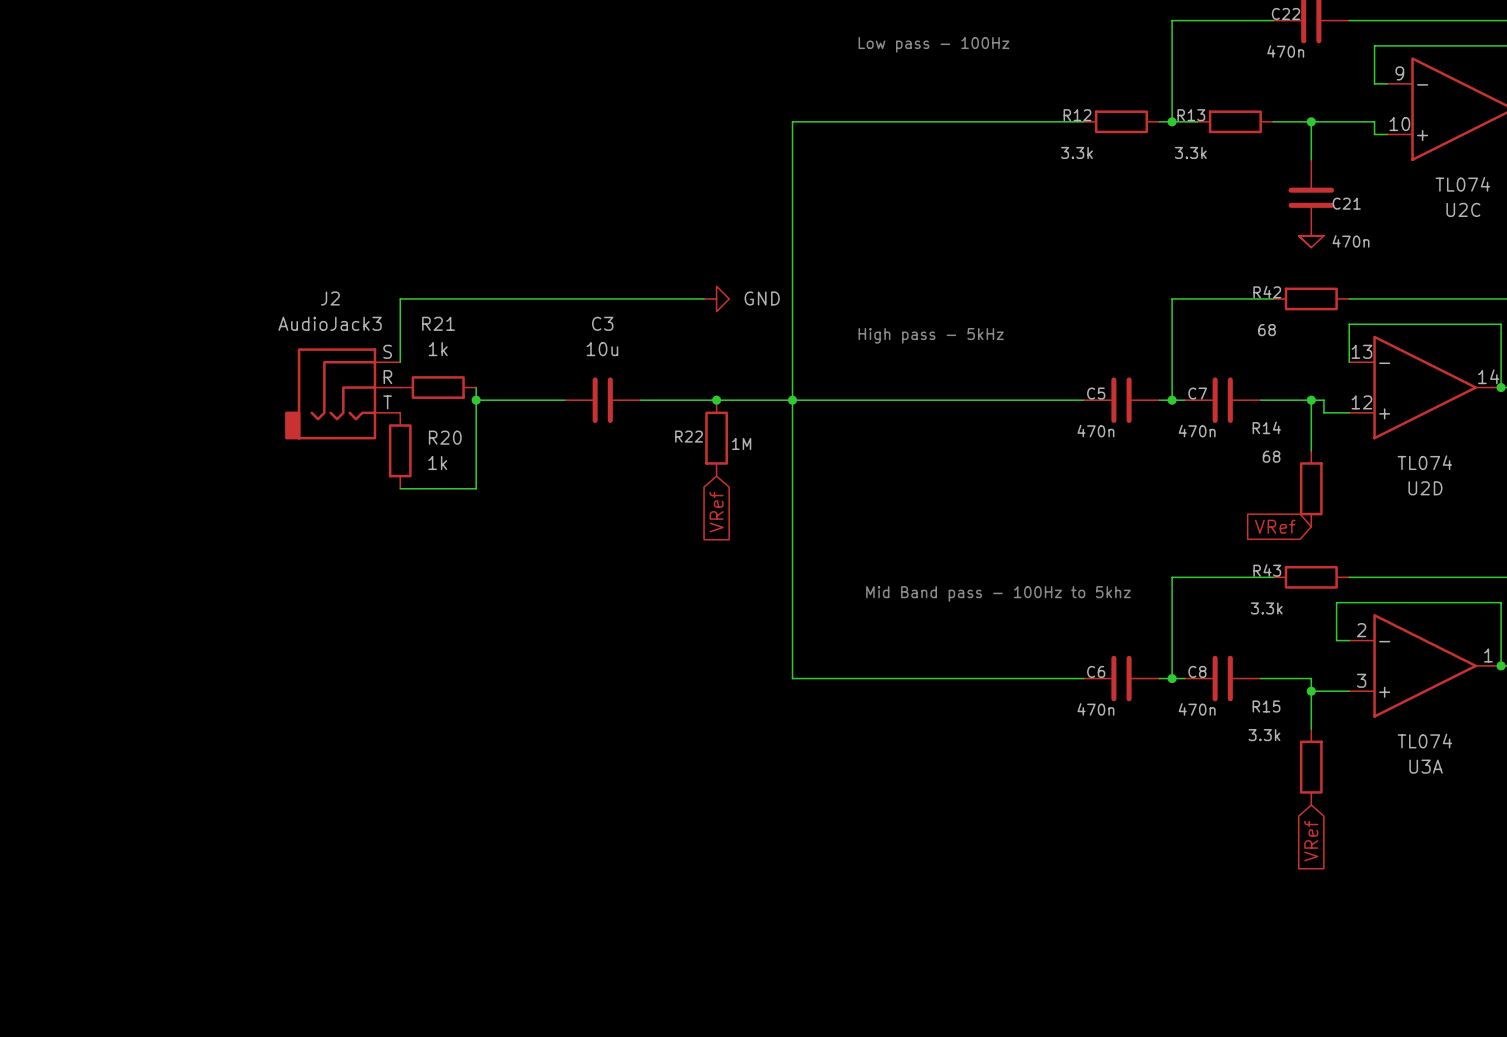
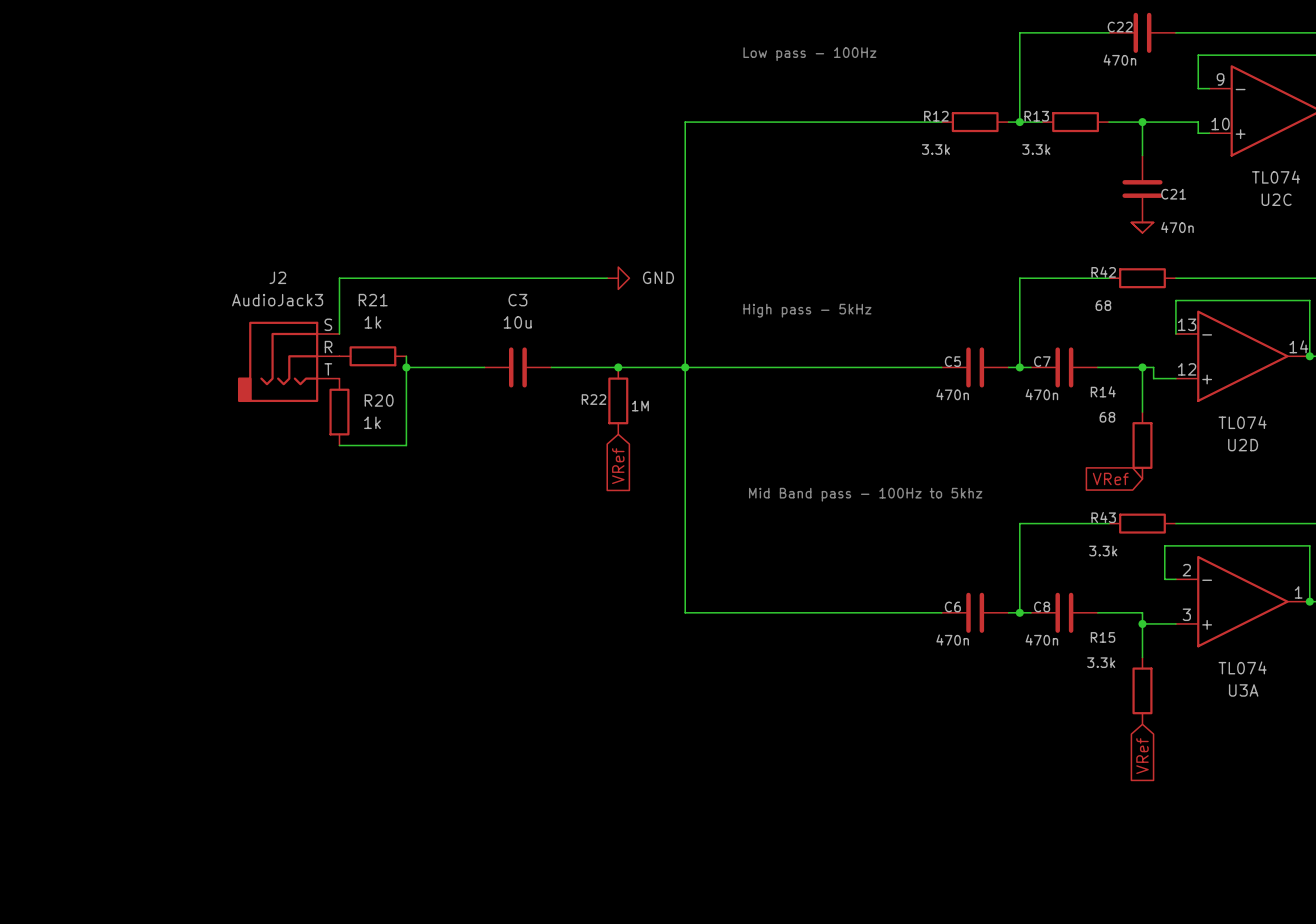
text position: Mid Band pass - 100Hz to 5khz (998, 593) -> Mid Band pass - 100Hz to 5khz (865, 494)

